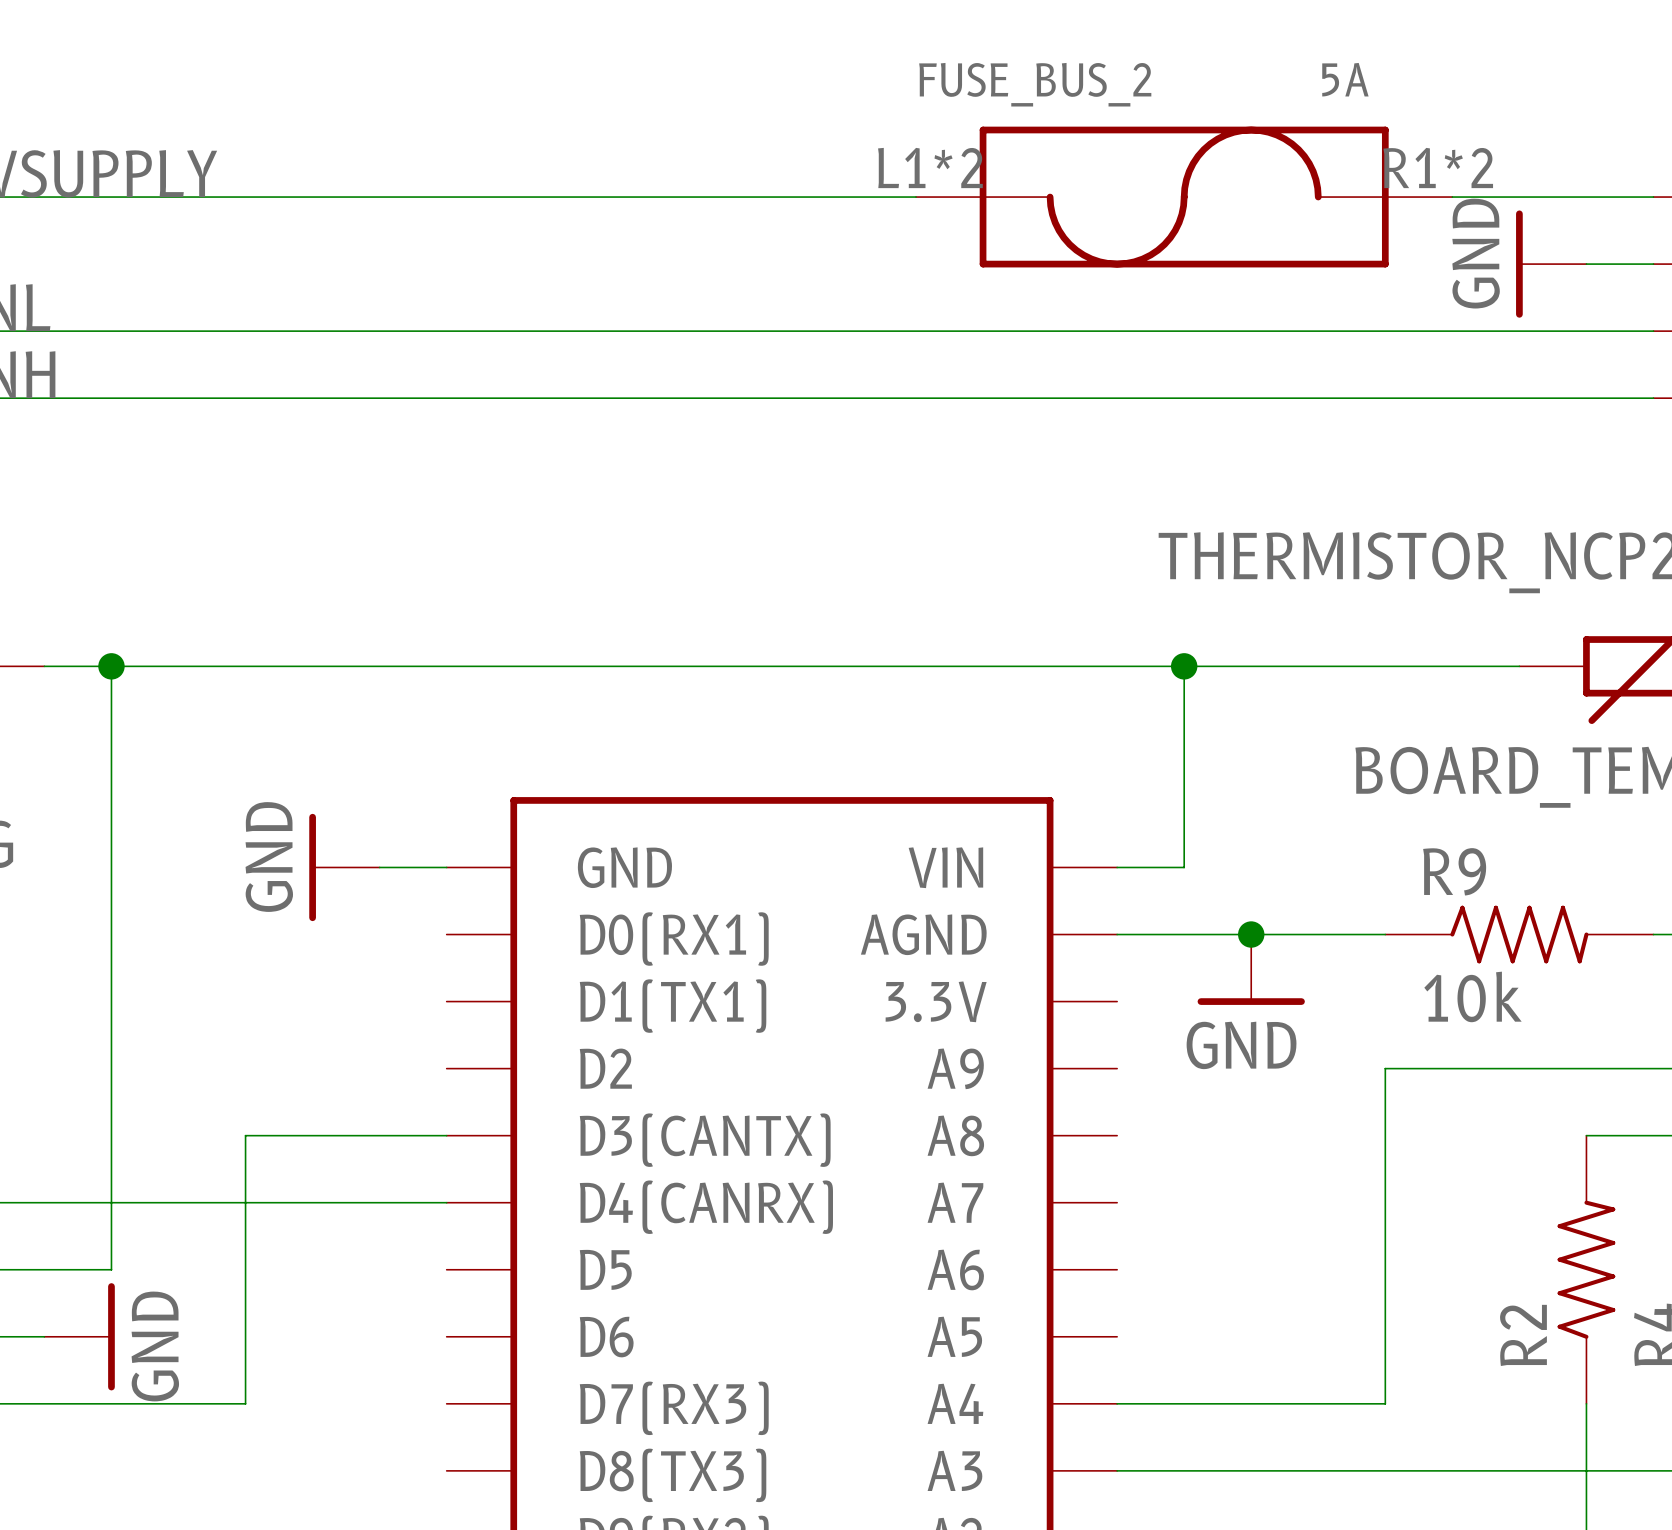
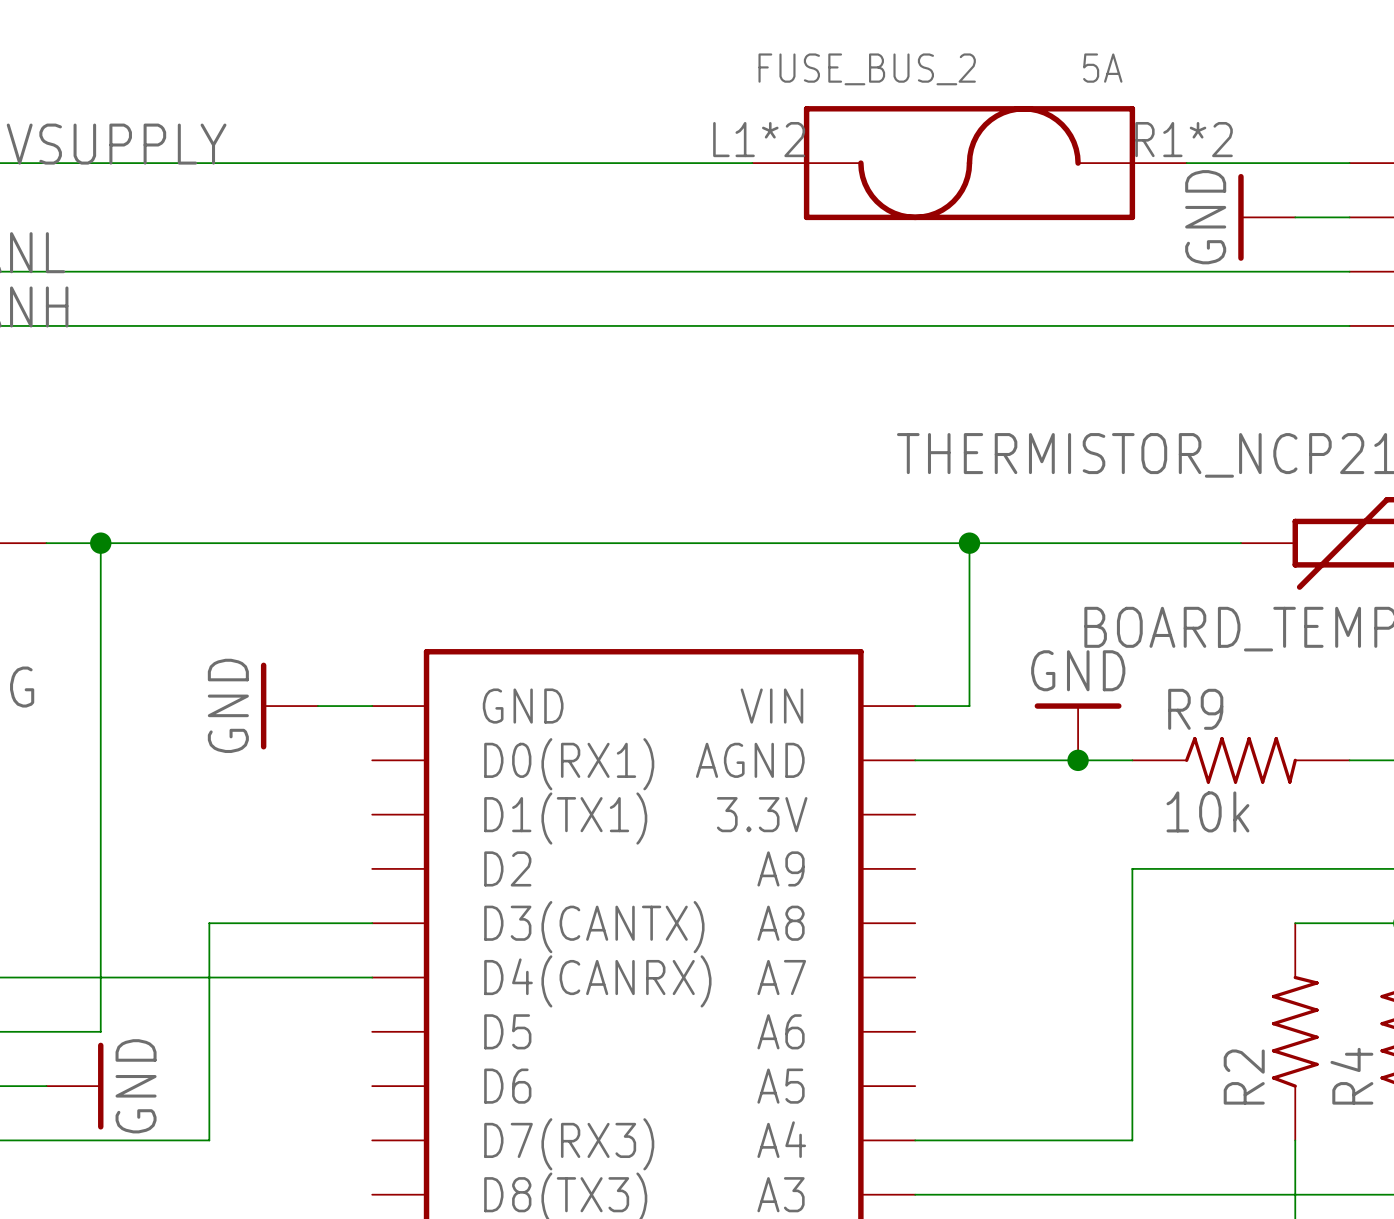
junction position: (1251, 934) -> (1078, 760)
power symbol position: GND (1251, 969) -> GND (1078, 731)
power symbol rotation: 0° (1251, 1001) -> 180° (1078, 706)

